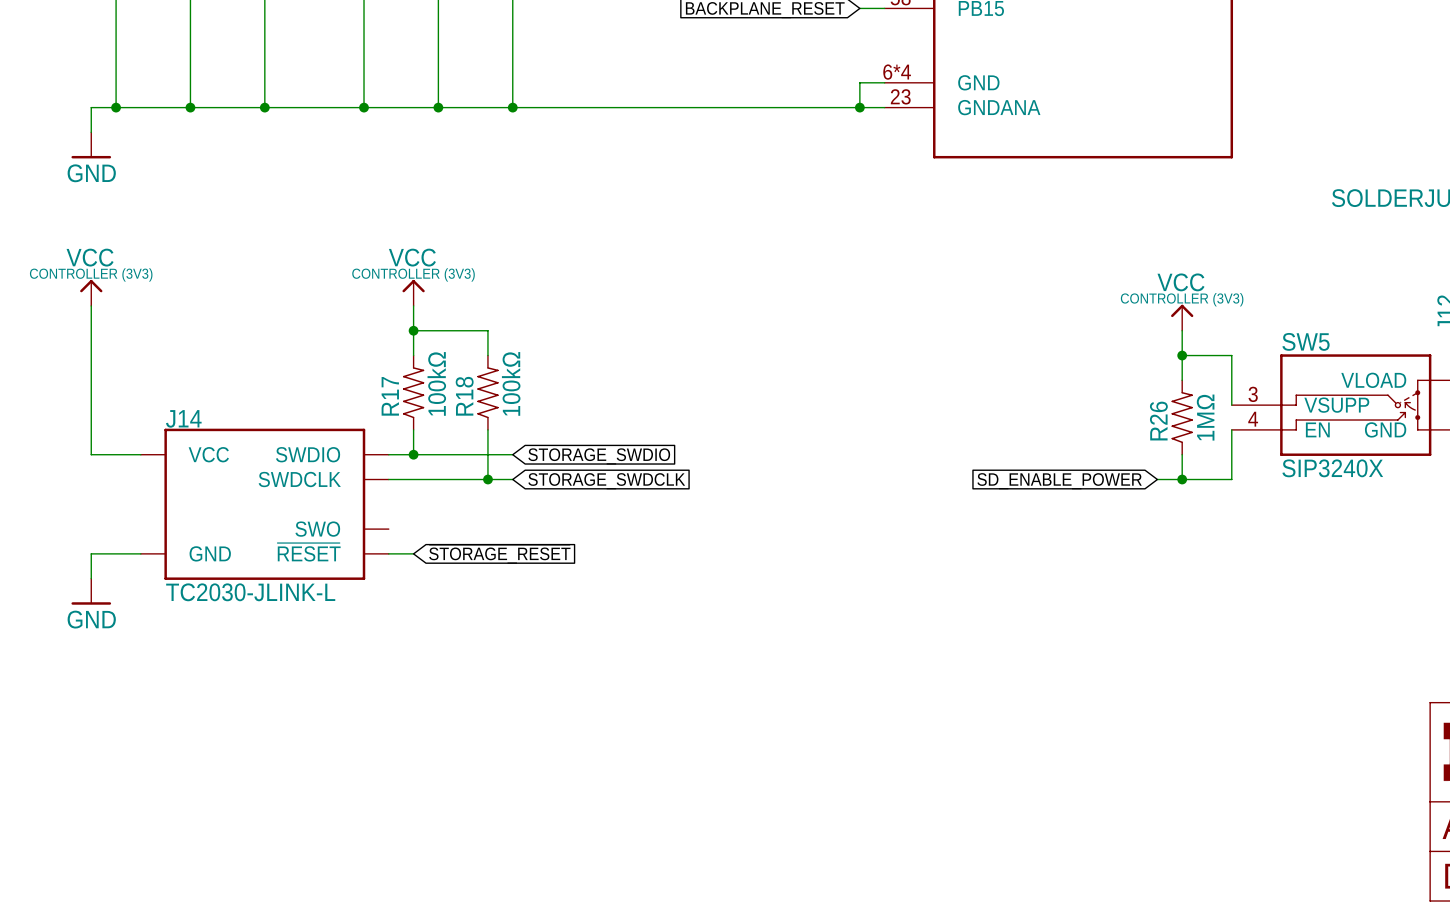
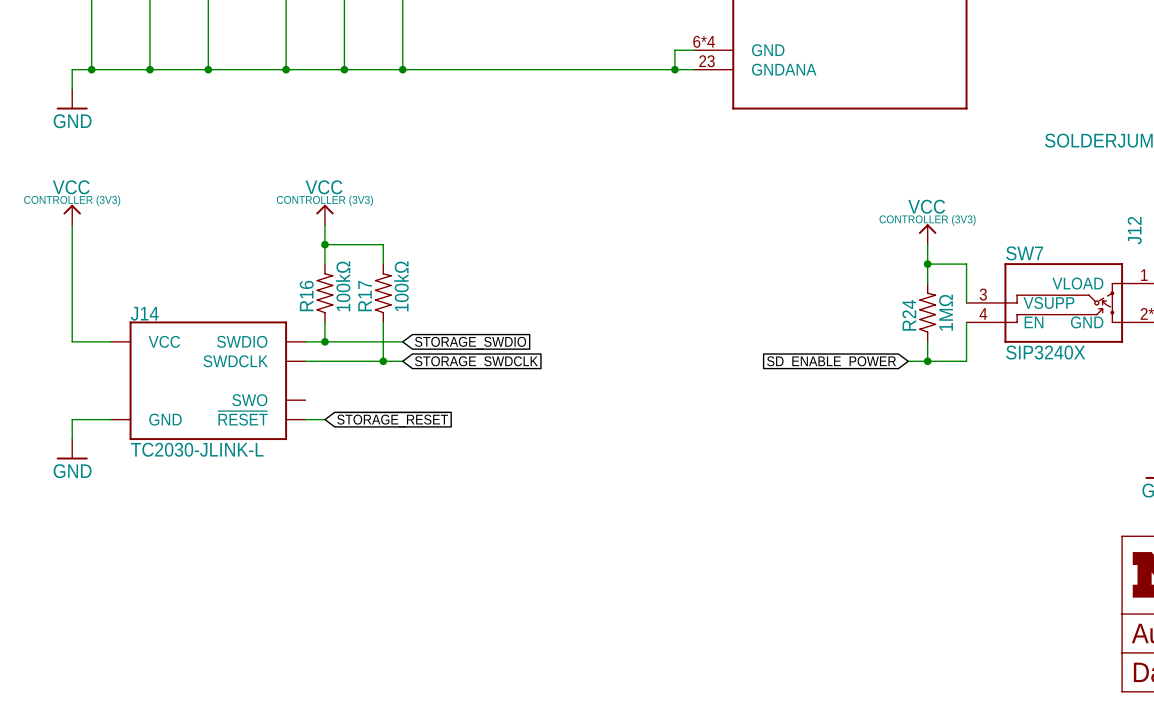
SW5 name: SW5 (1306, 341) -> SW7 (1024, 253)
R17 name: R17 (390, 396) -> R16 (306, 296)
R18 name: R18 (464, 396) -> R17 (365, 296)
R26 name: R26 (1158, 421) -> R24 (909, 315)

